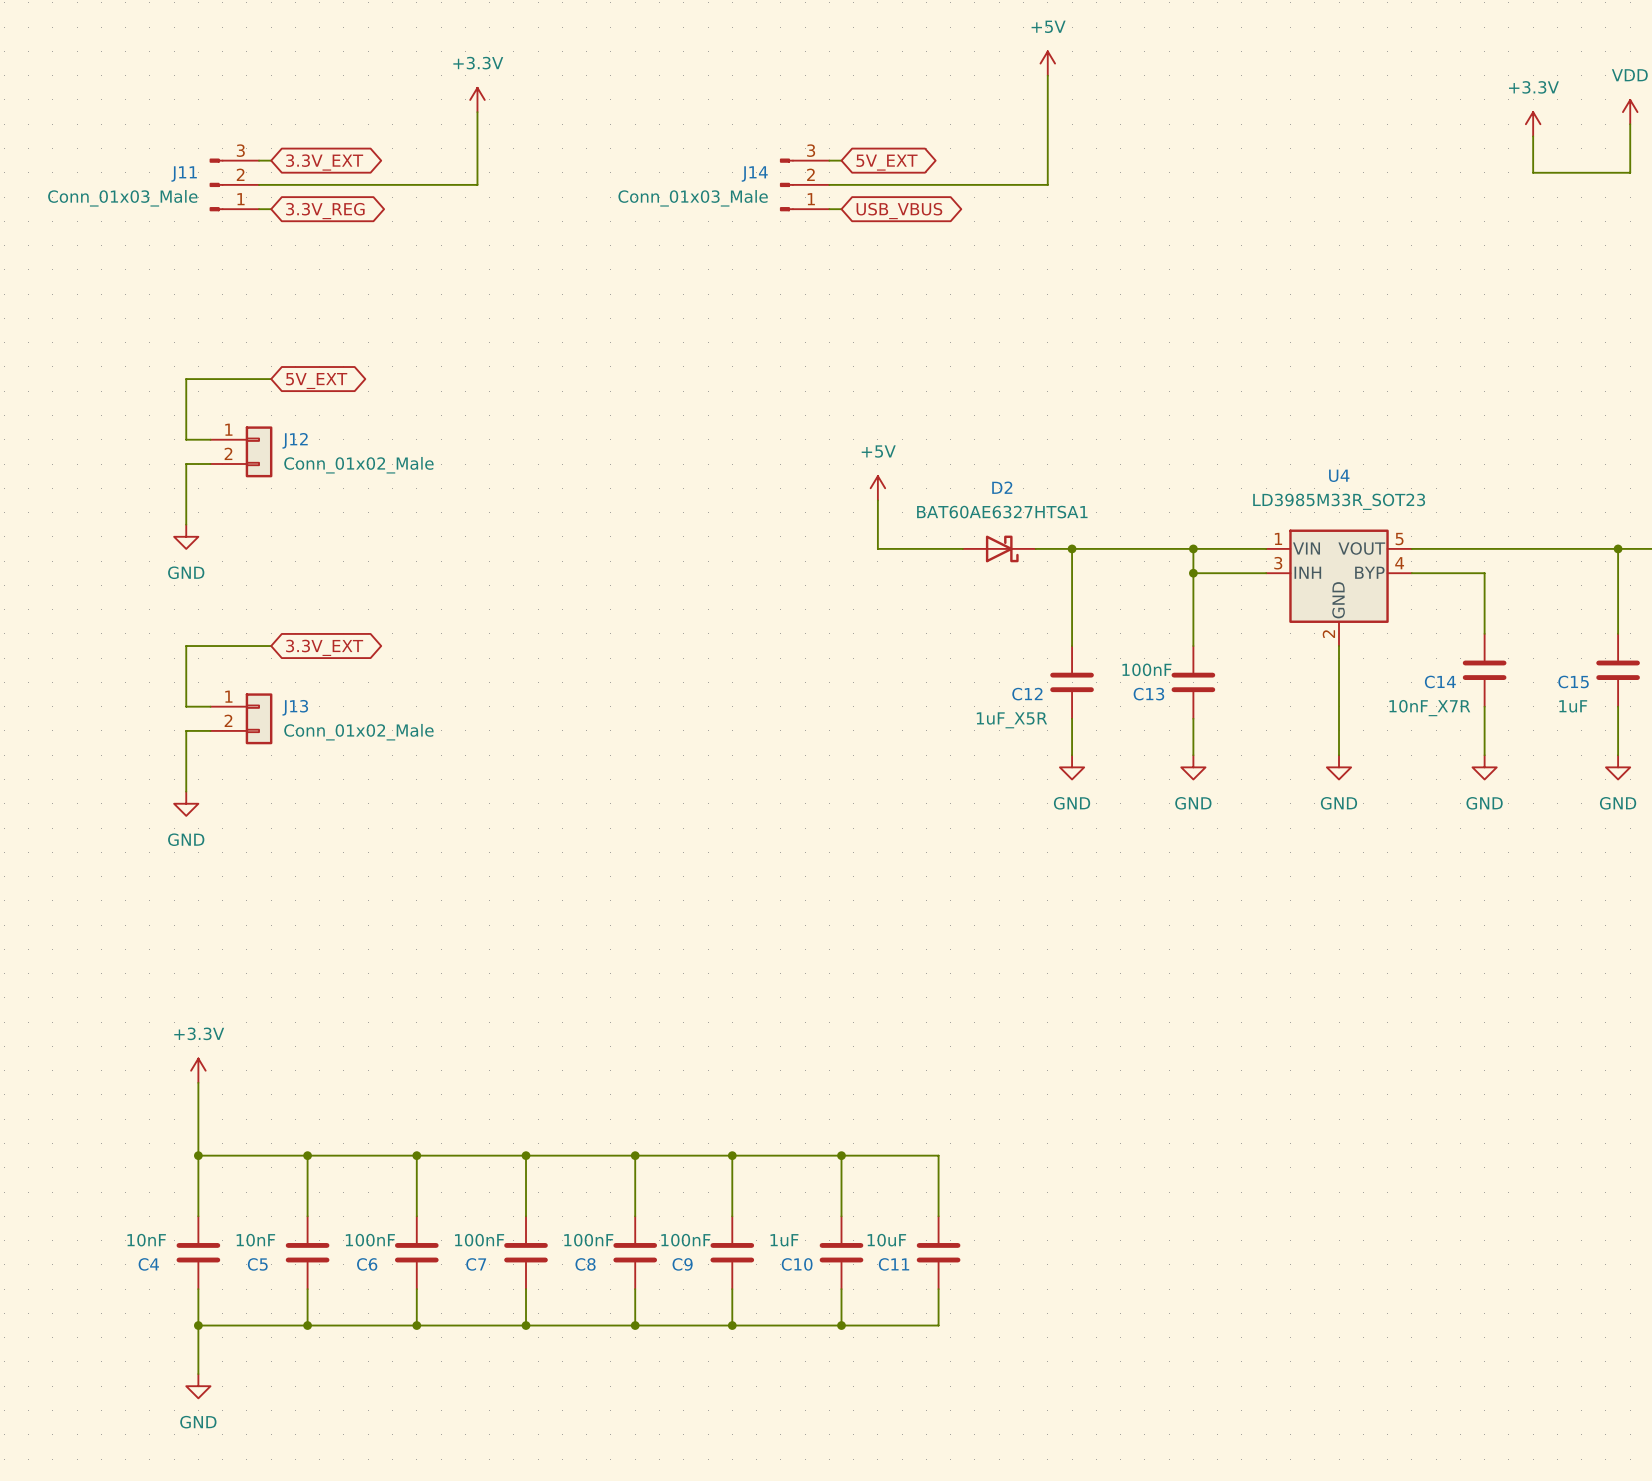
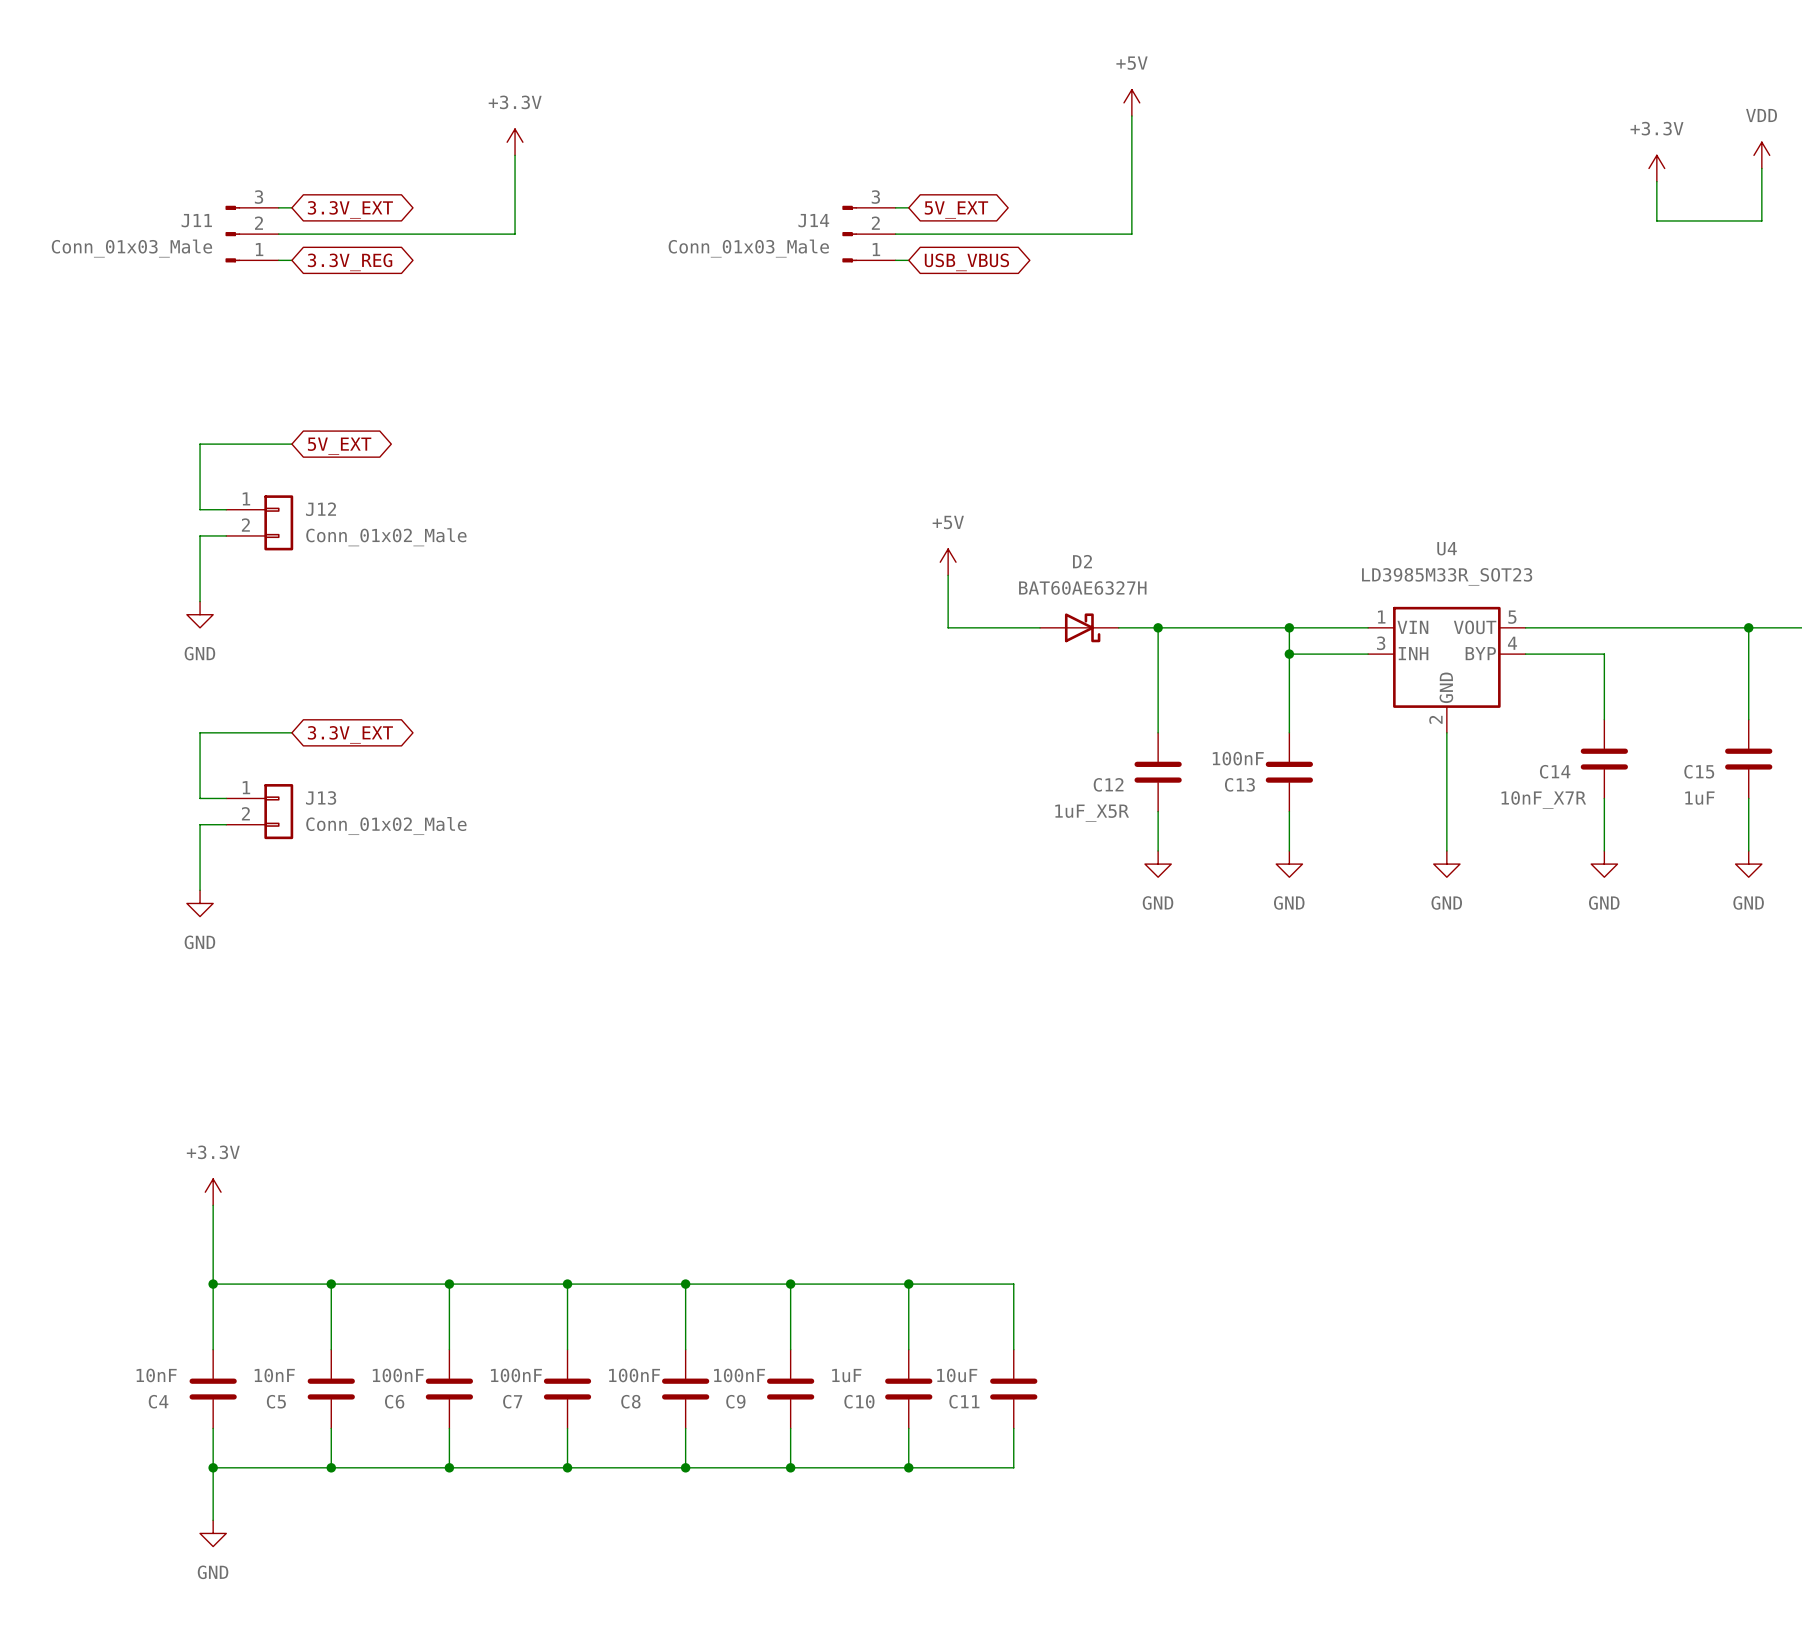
D2 value: BAT60AE6327HTSA1 (1002, 512) -> BAT60AE6327H (1082, 587)

